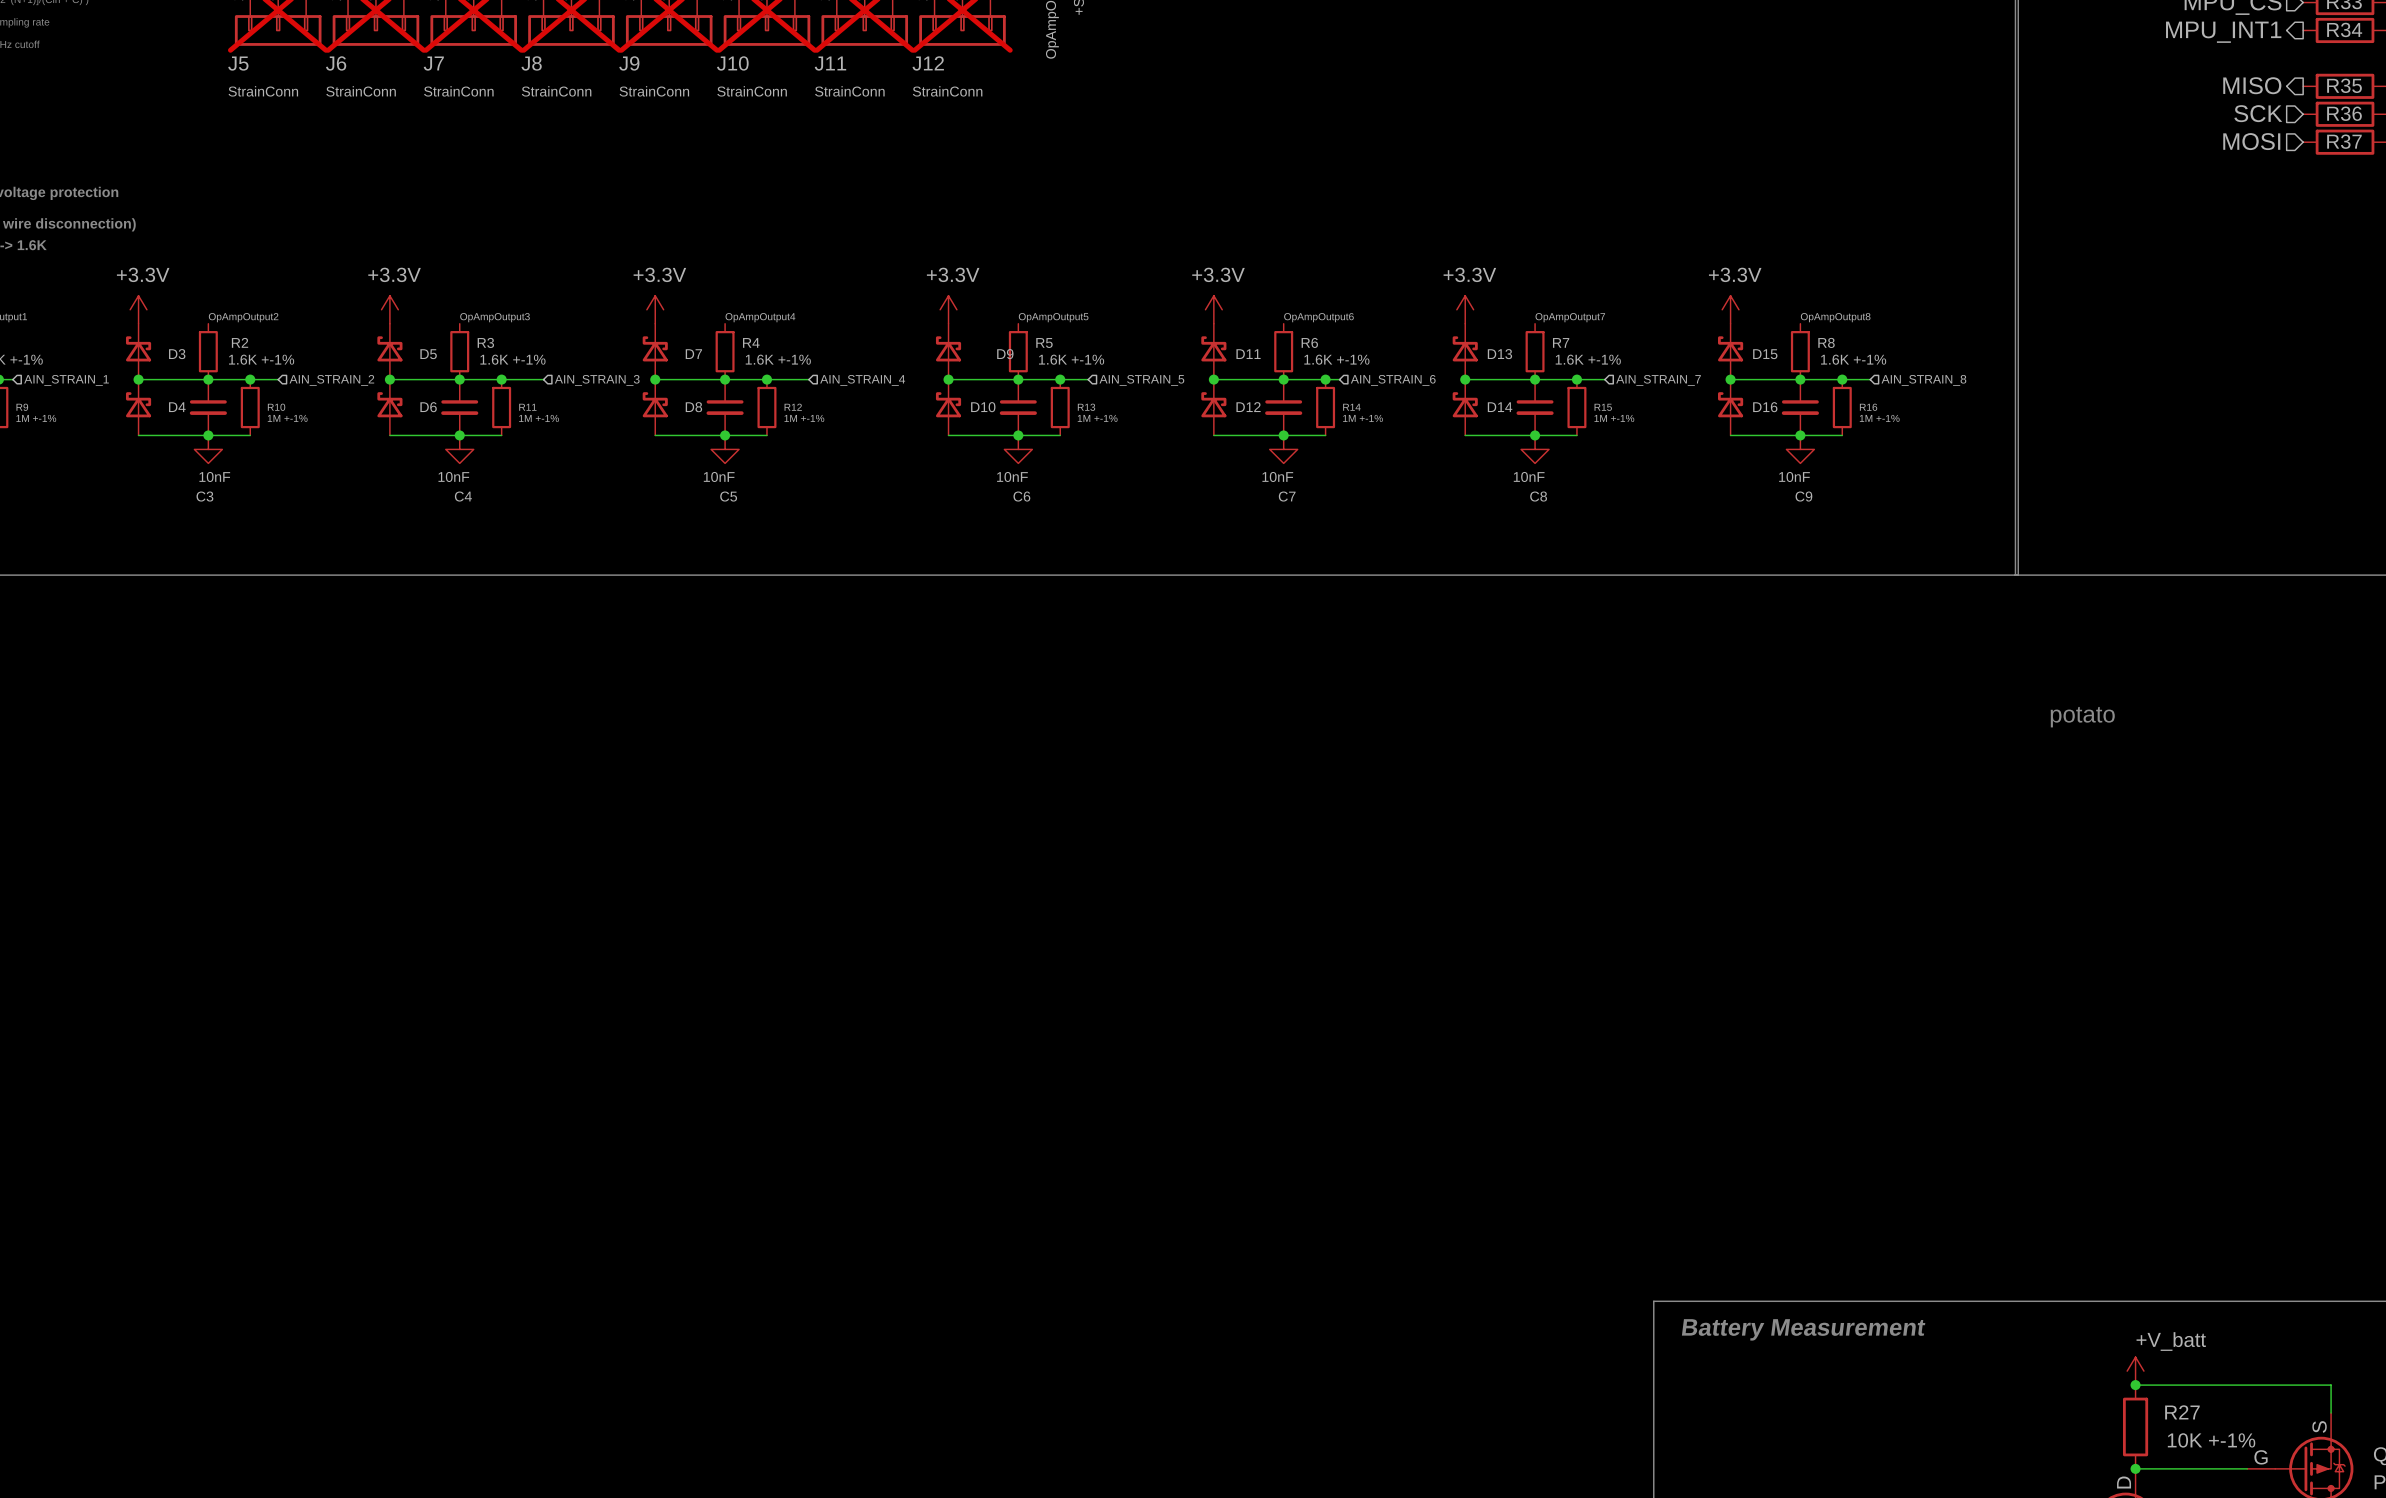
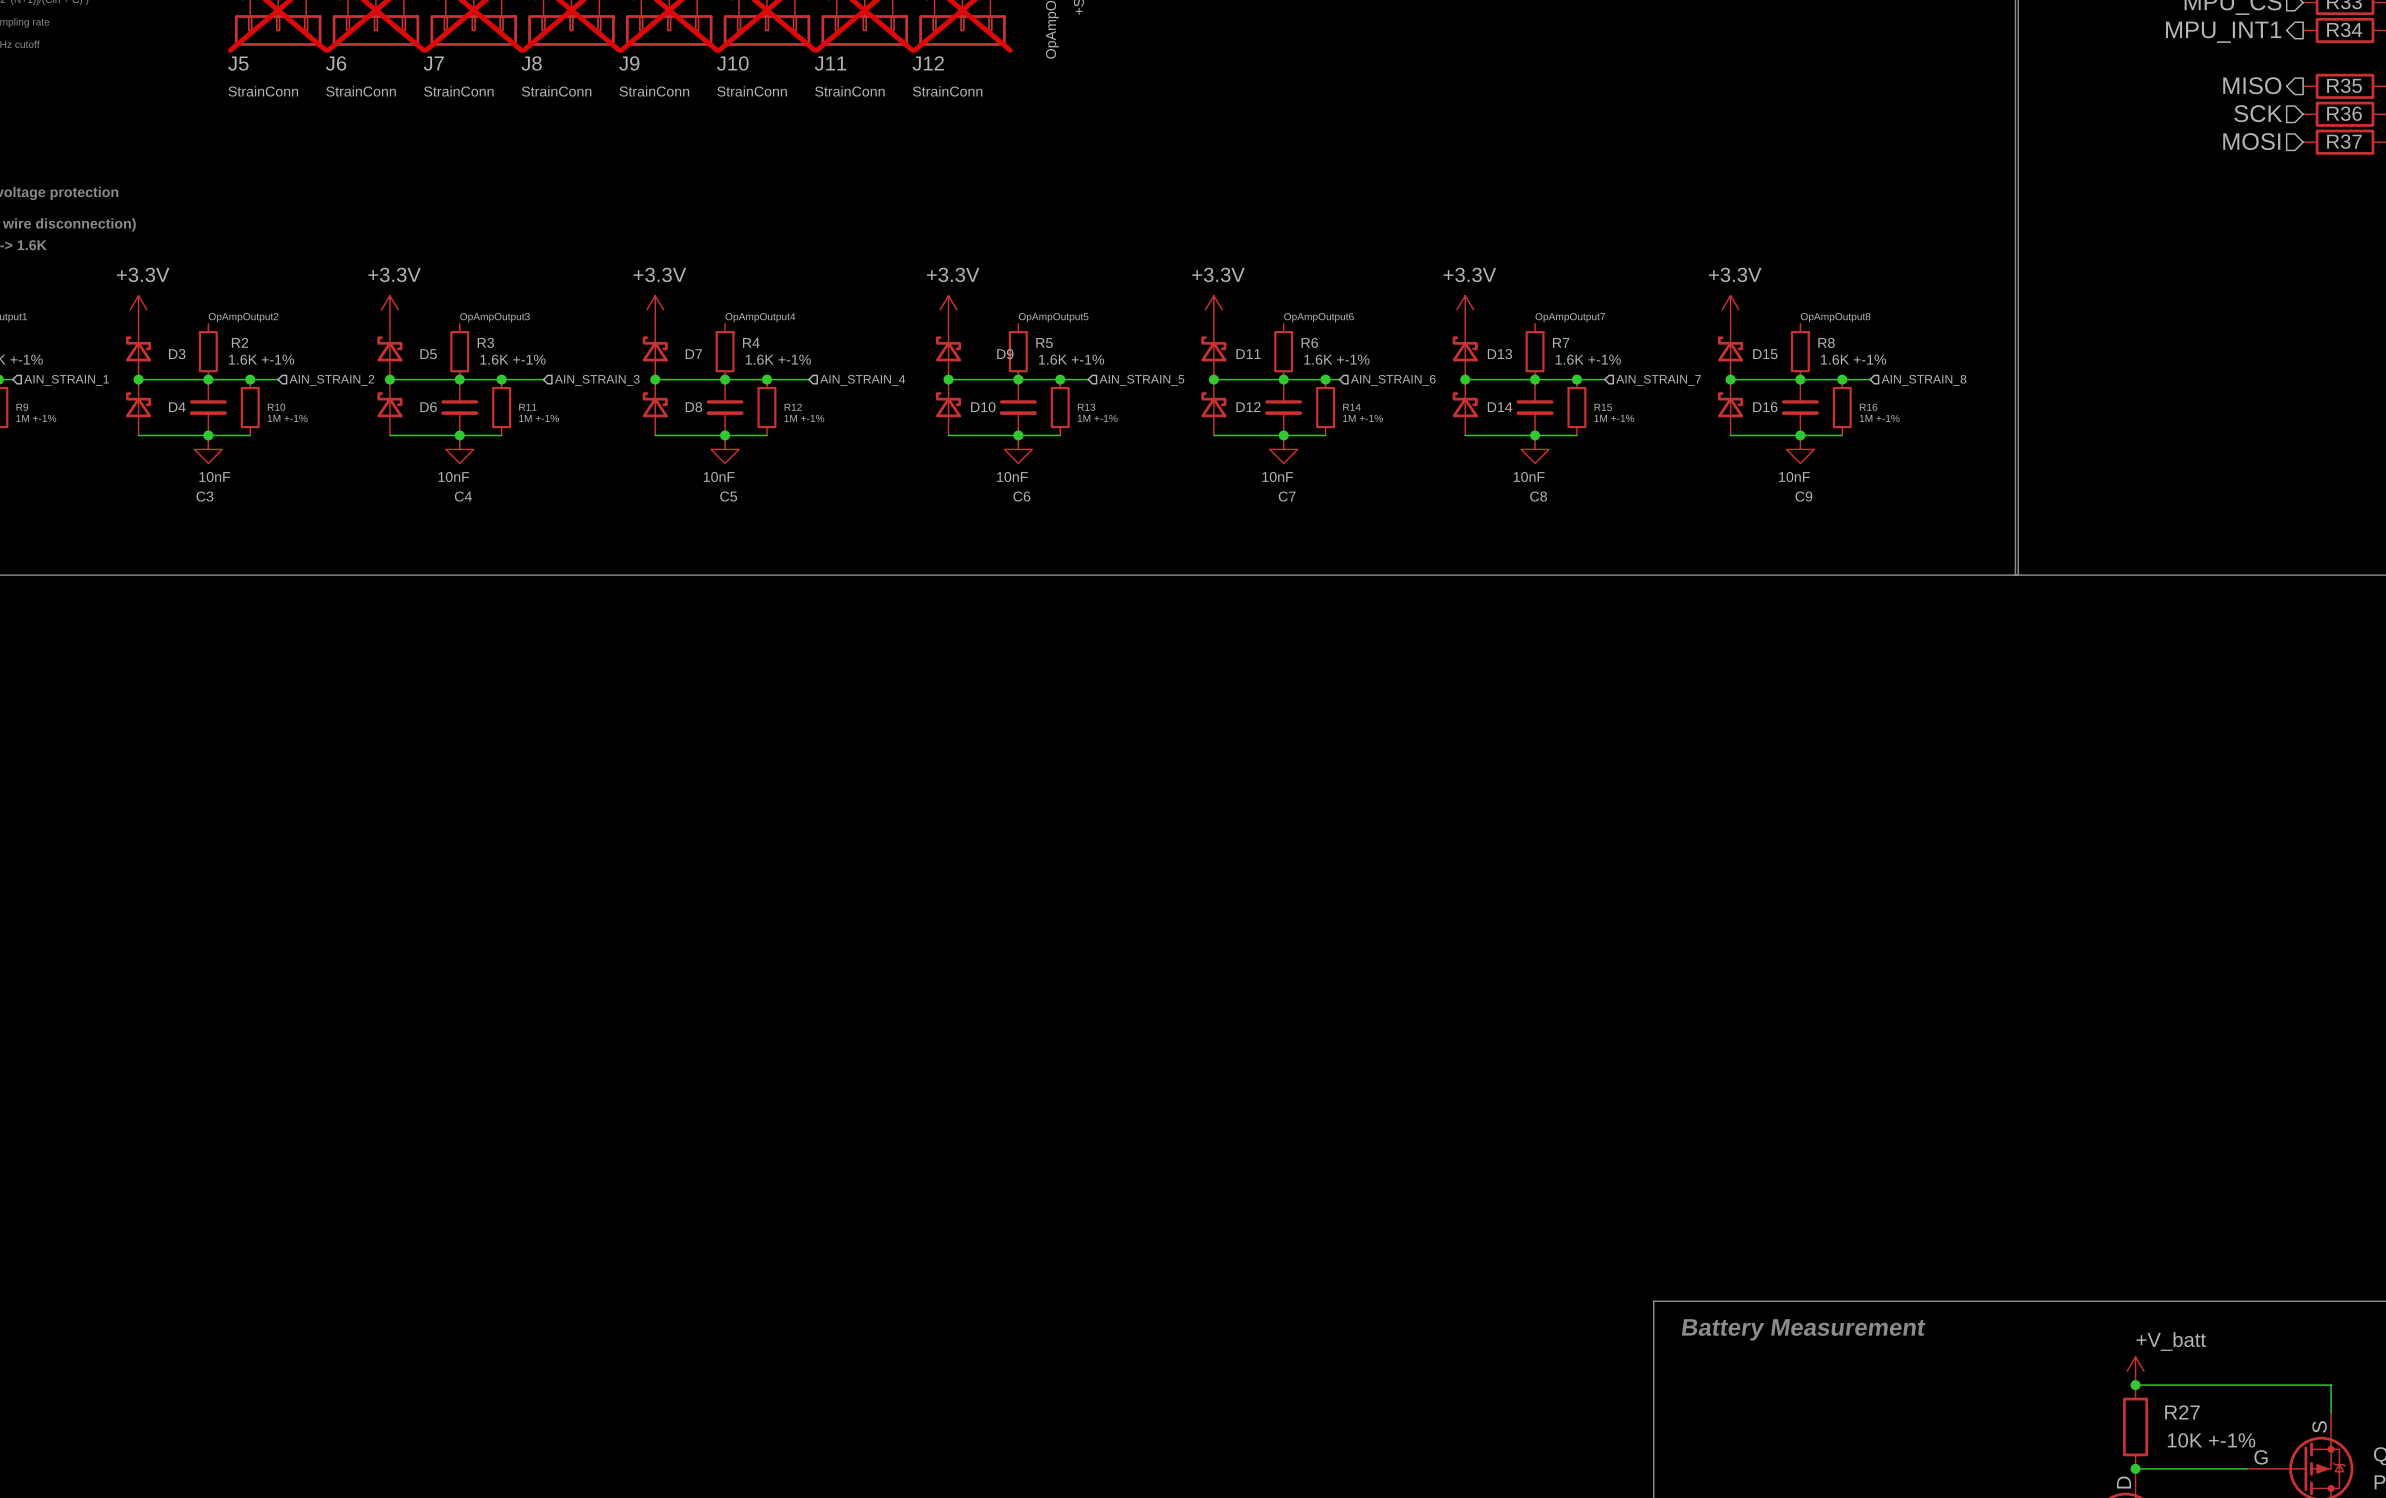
text: potato (2082, 717) -> none

